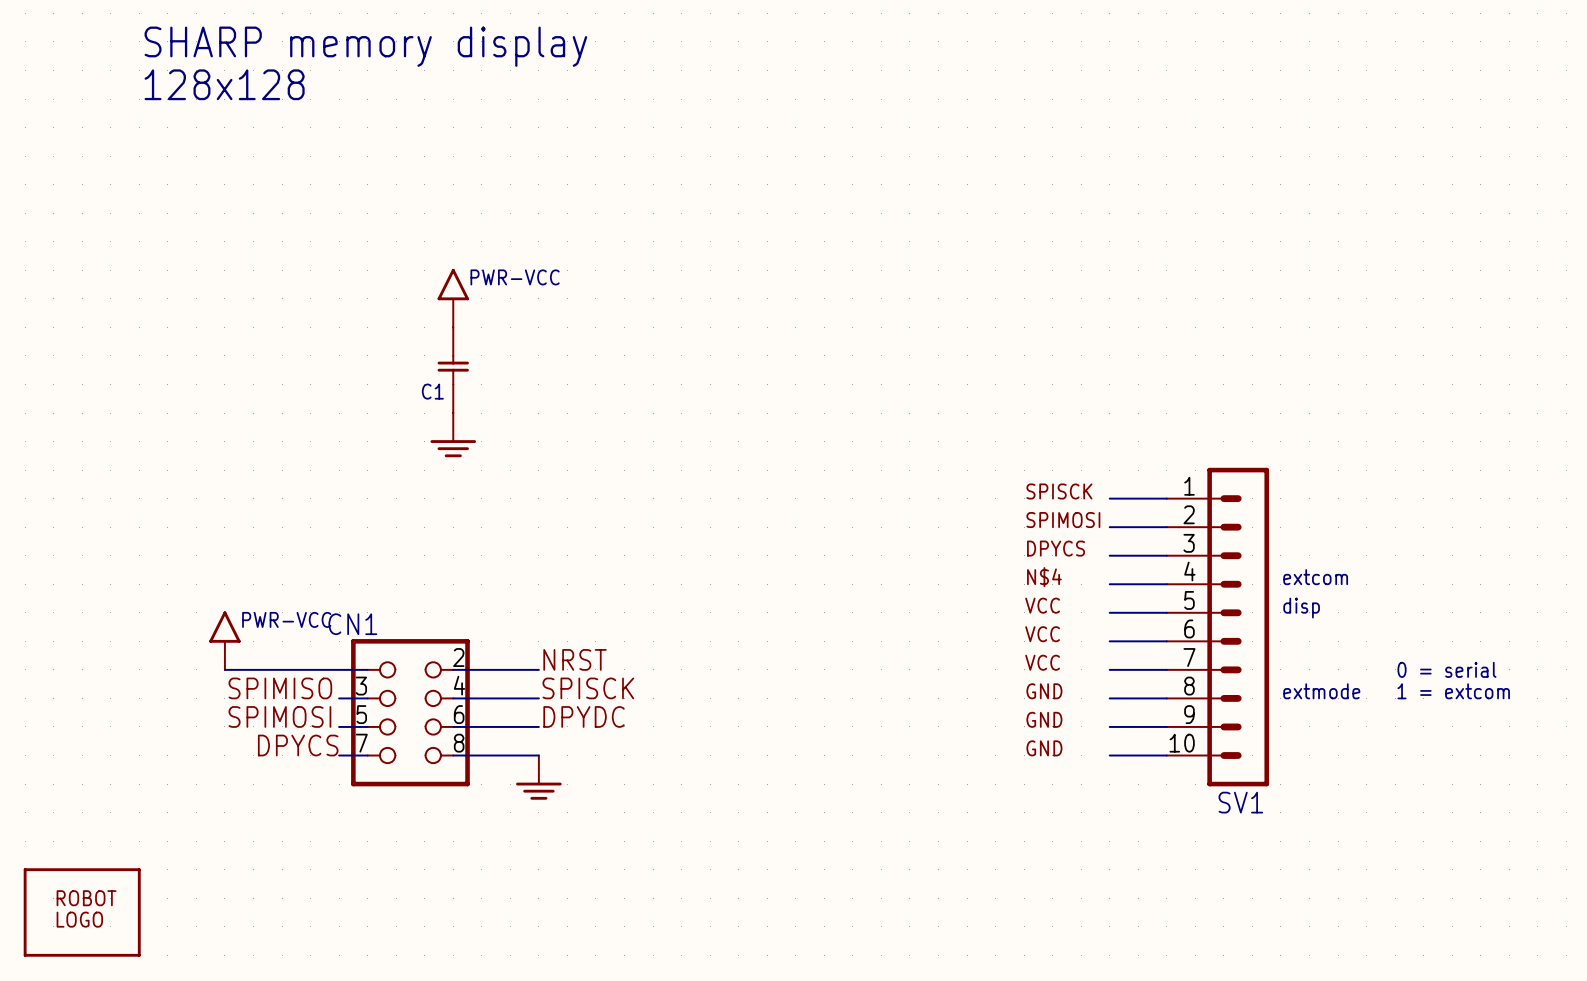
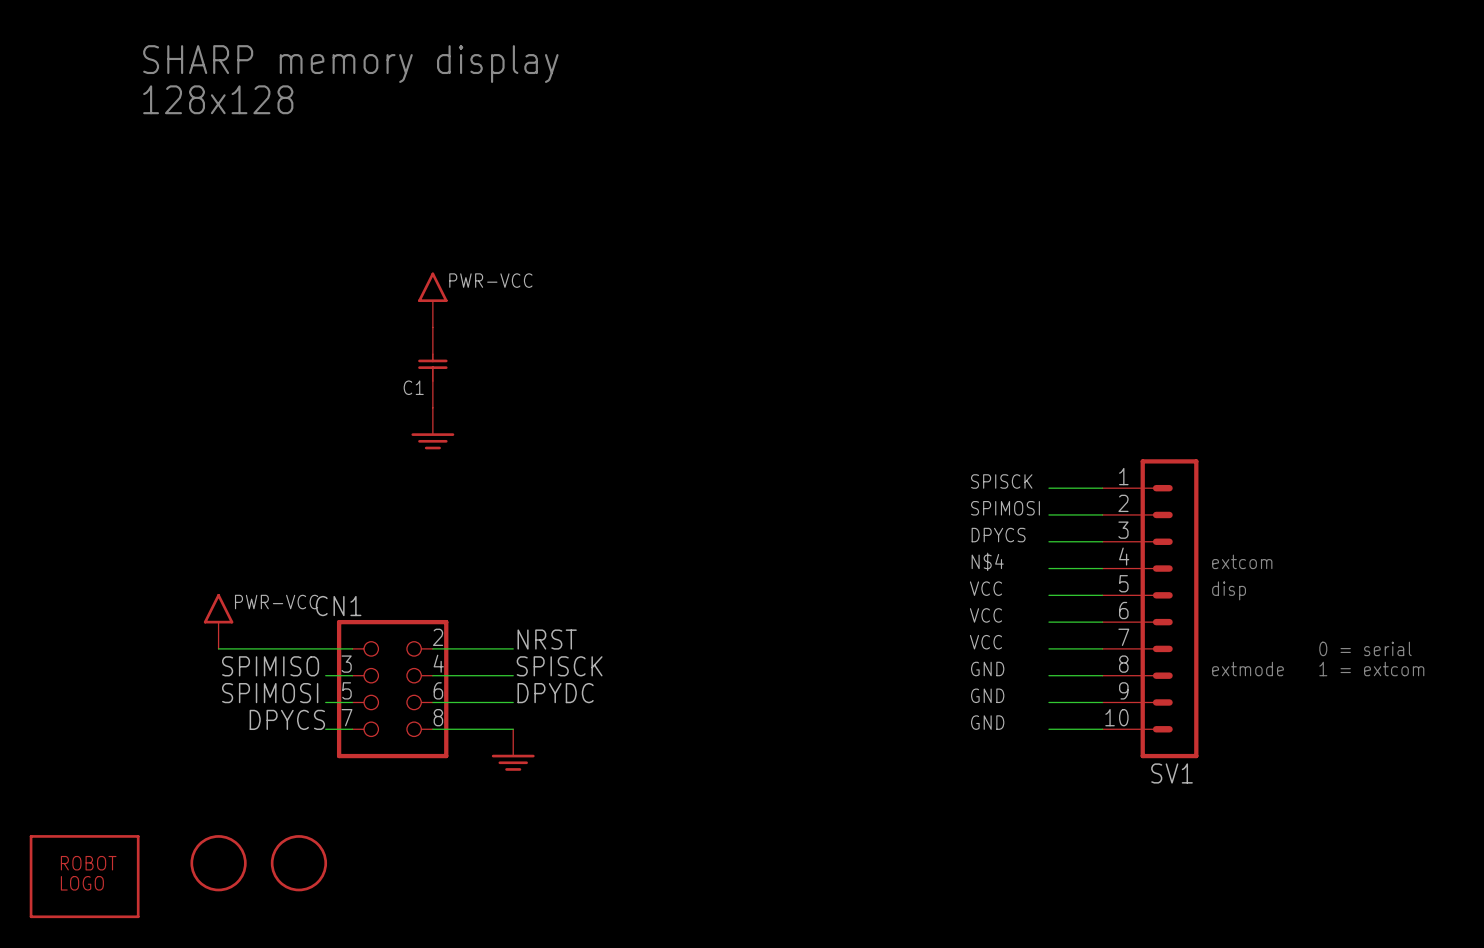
part: none -> (218, 863)
part: none -> (298, 863)

